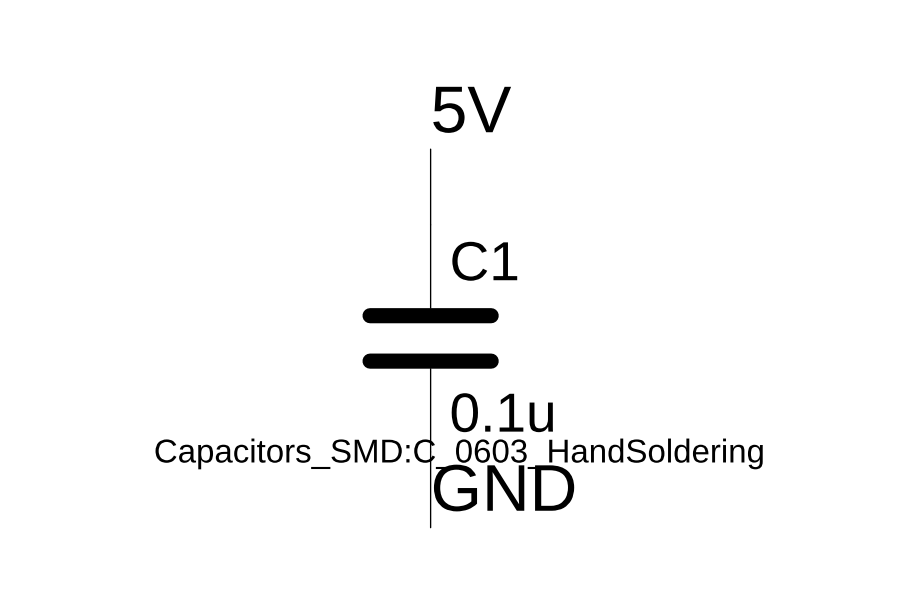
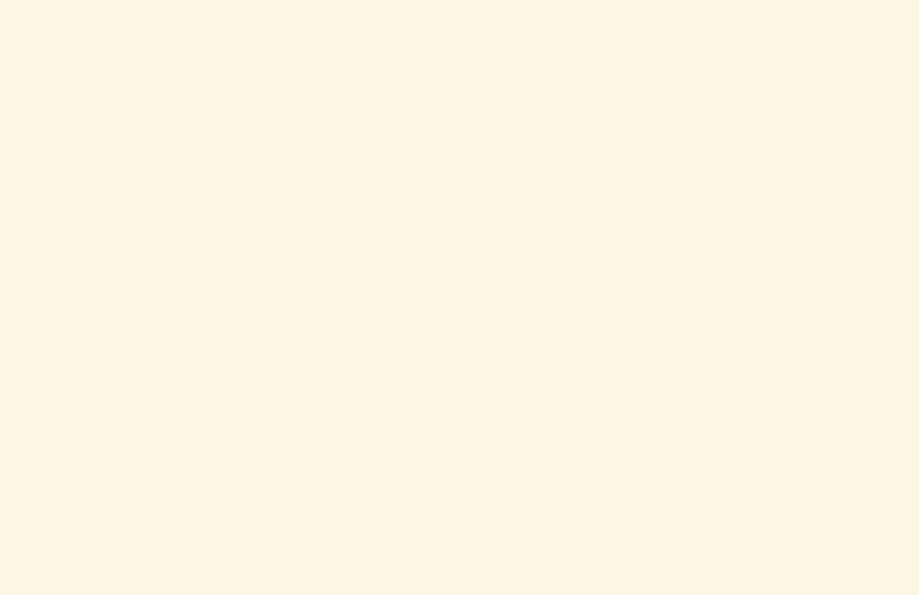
label: 5V (472, 109) -> none
wire: (430, 149) (430, 224) -> none
C1: 0.1u (430, 338) -> none
wire: (430, 451) (430, 527) -> none
label: GND (504, 488) -> none

